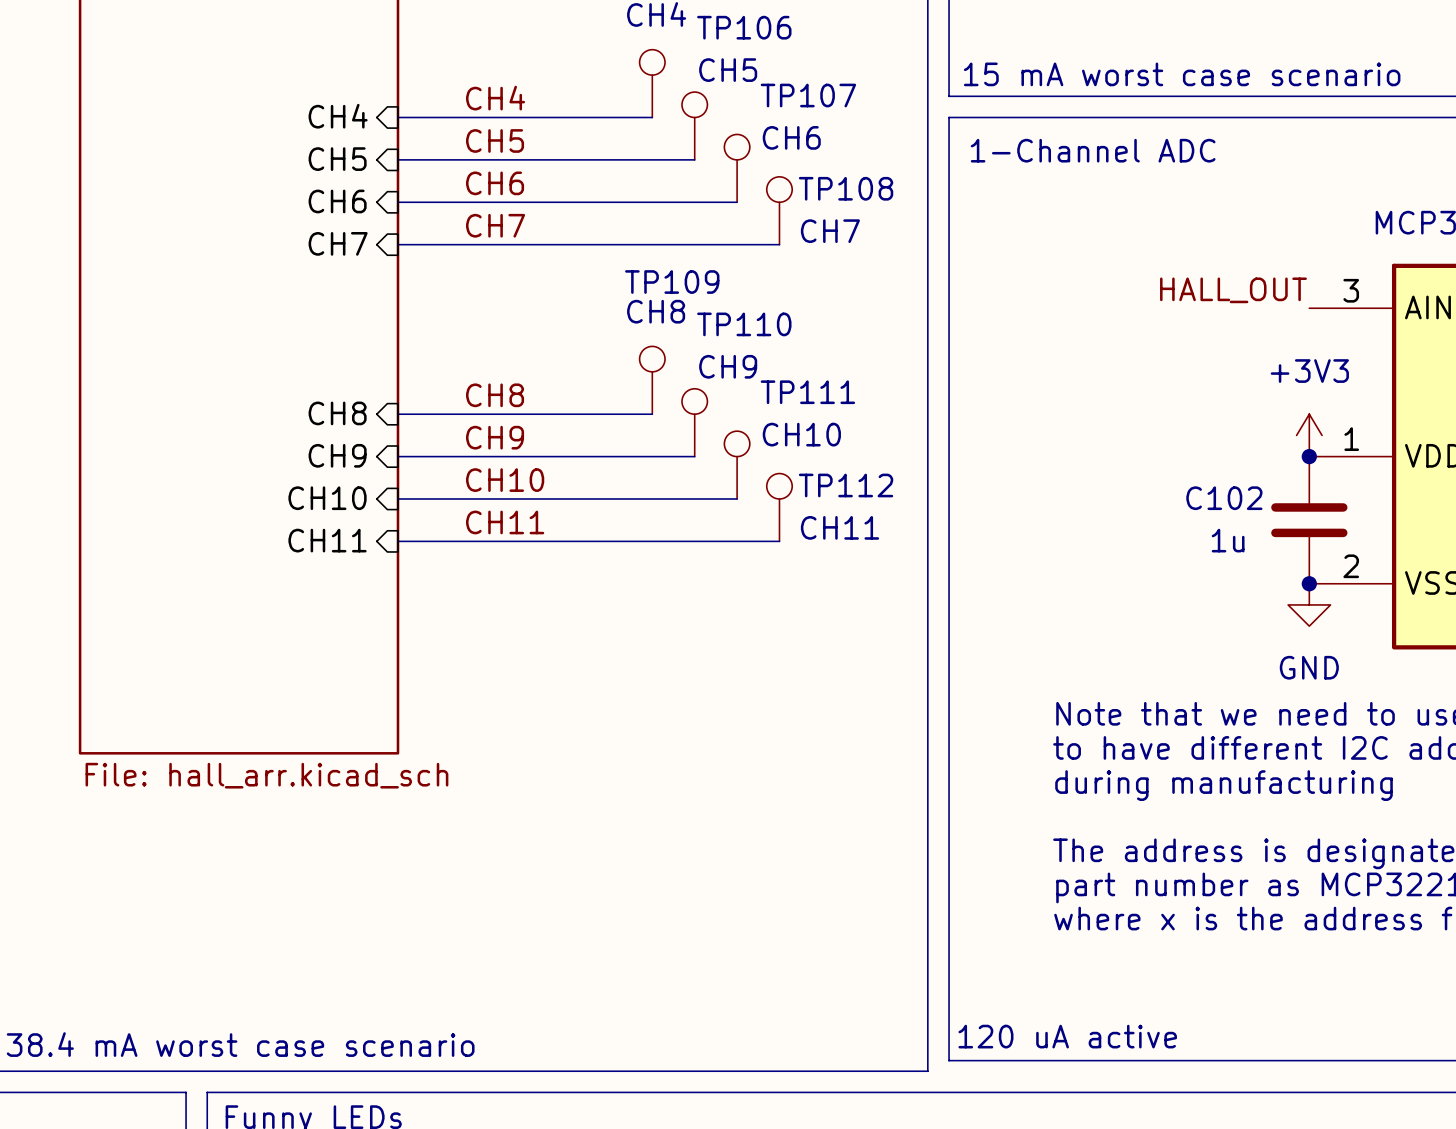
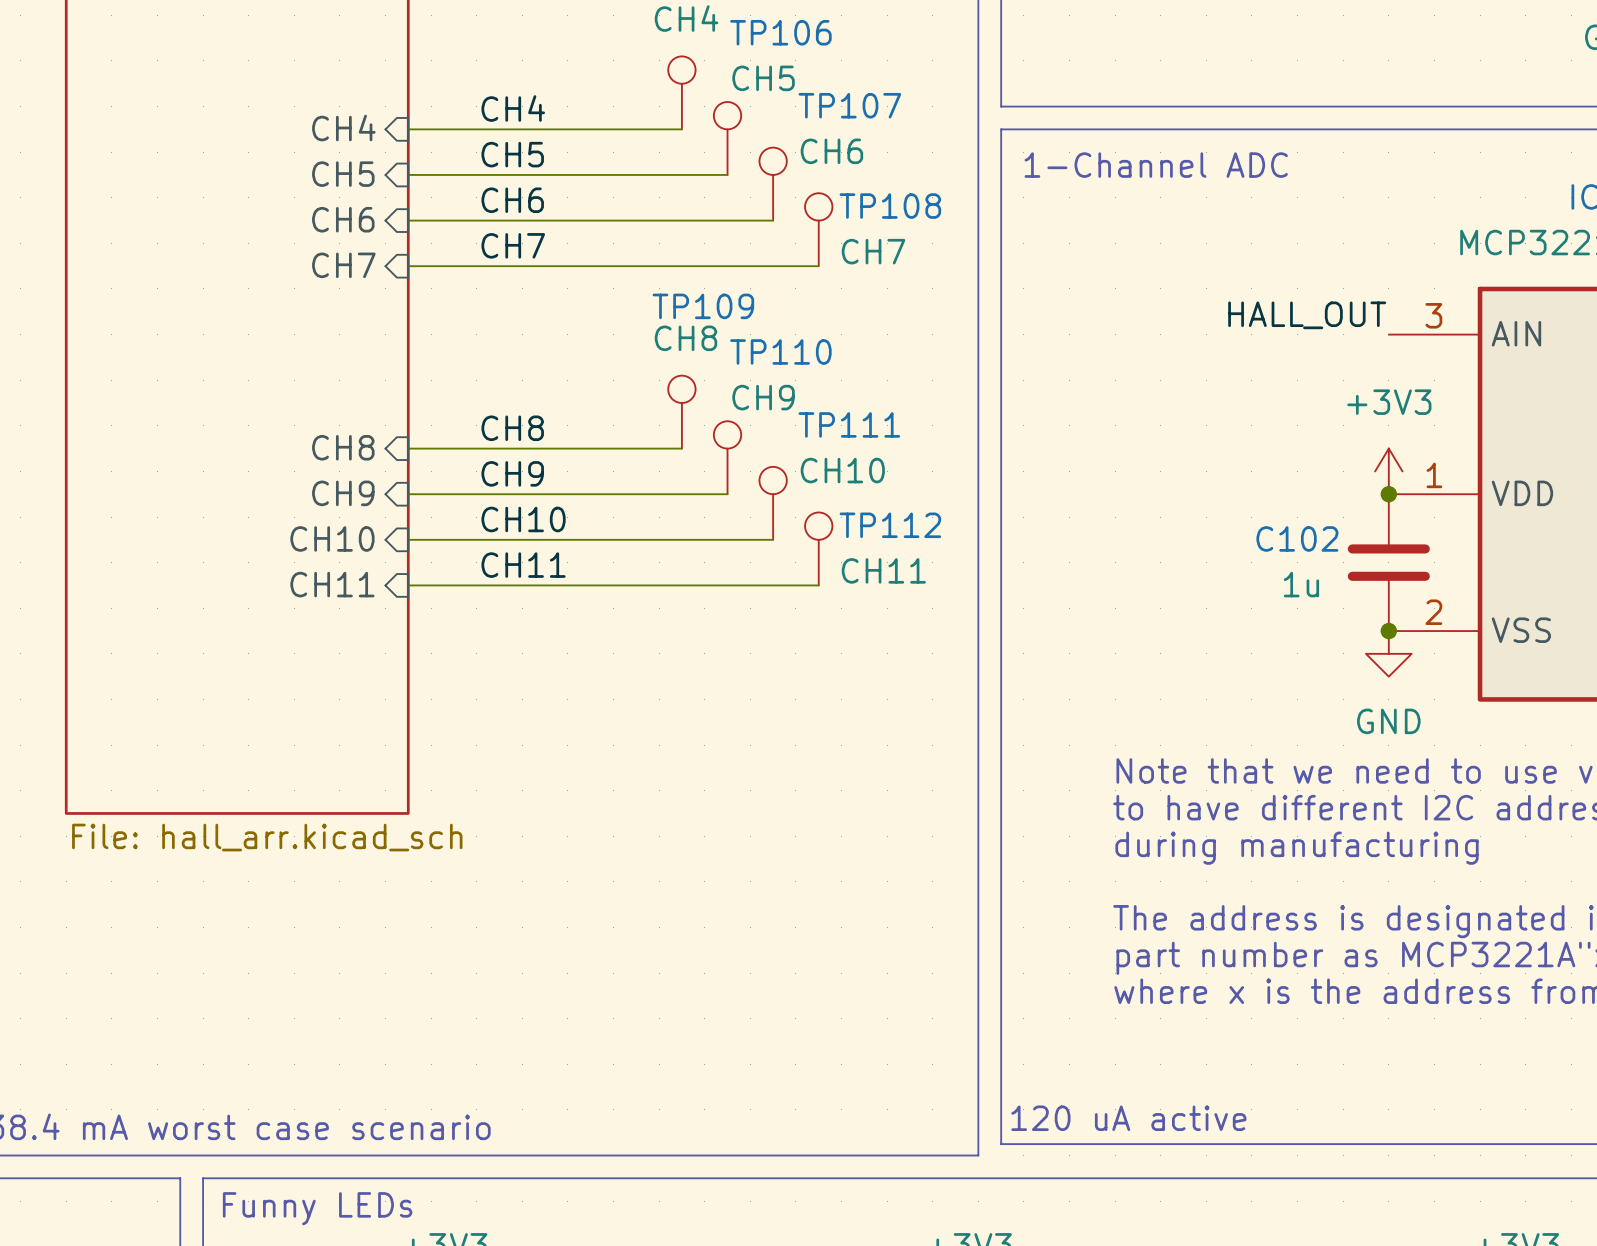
text: 15 mA worst case scenario (1182, 74) -> none

